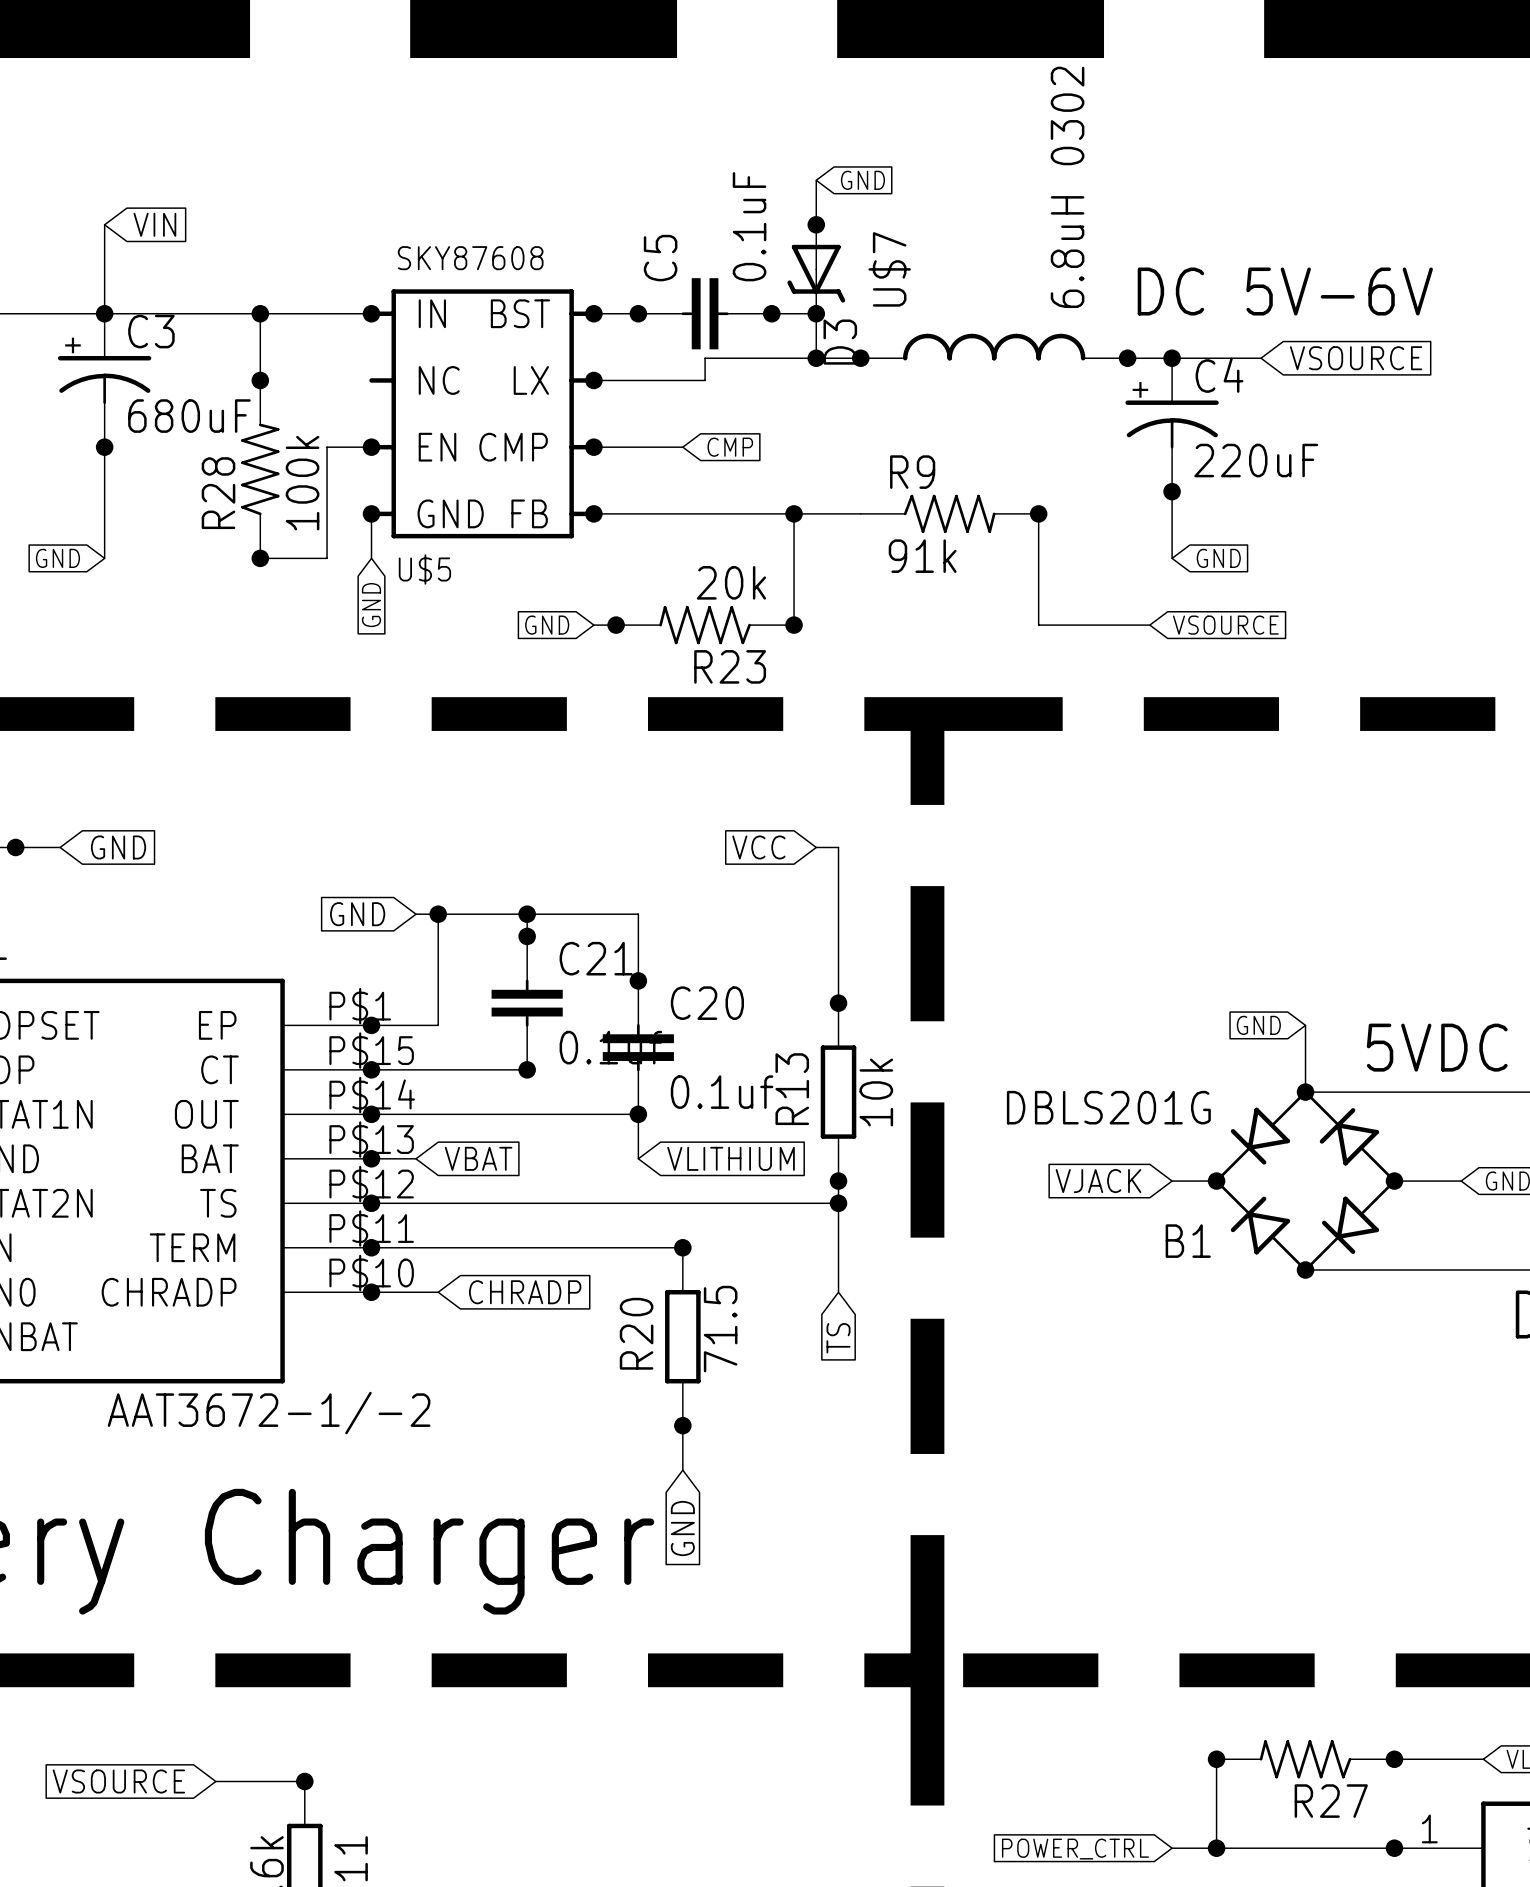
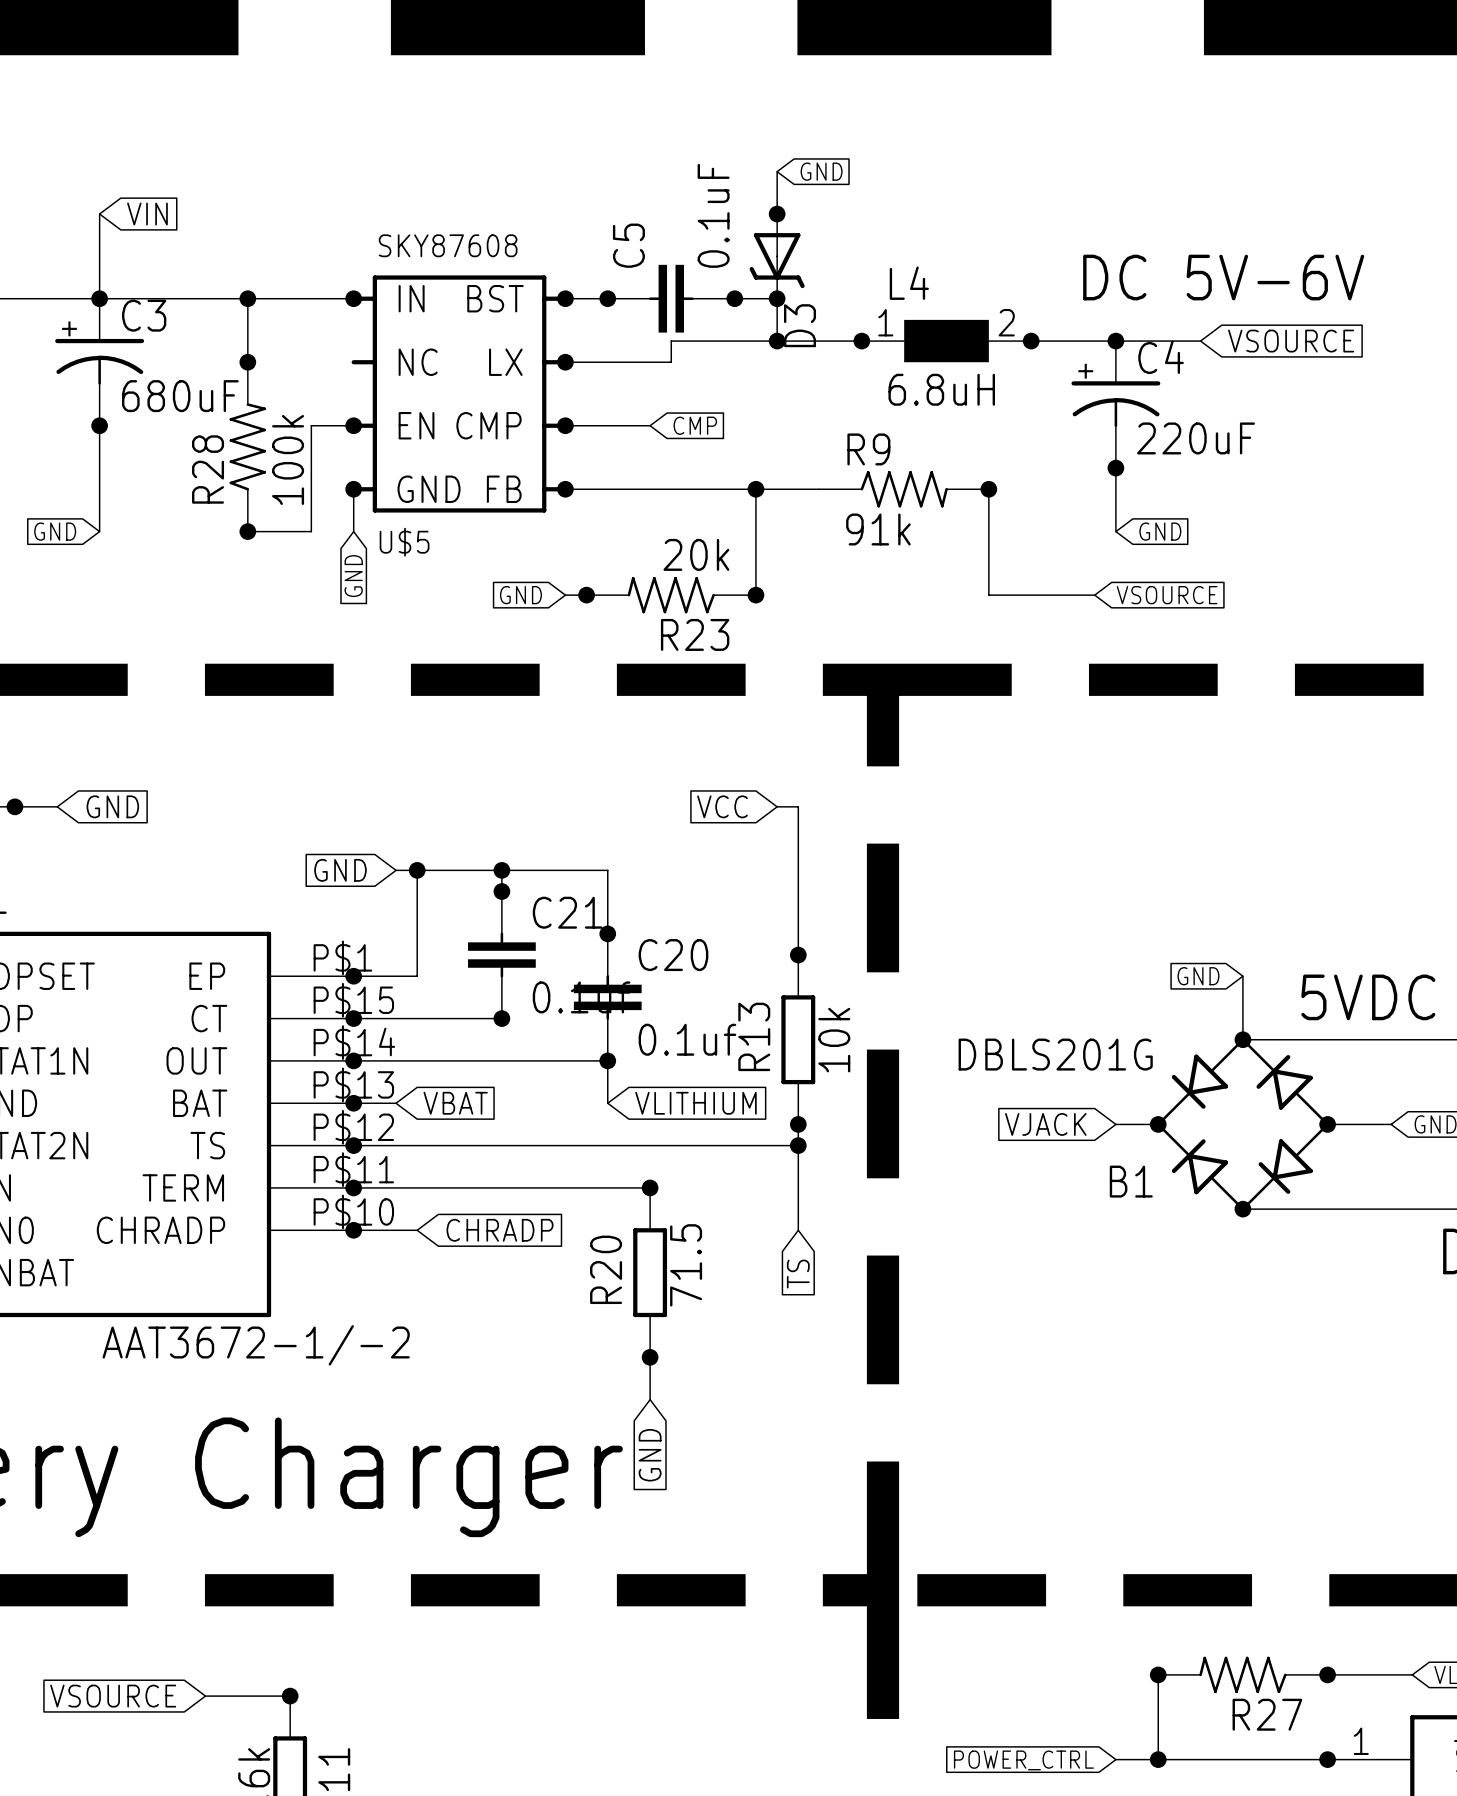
U$7: 6.8uH 0302 (994, 347) -> none
junction position: (860, 358) -> (861, 341)
L4: none -> 6.8uH (946, 341)
junction position: (1127, 358) -> (1031, 341)

